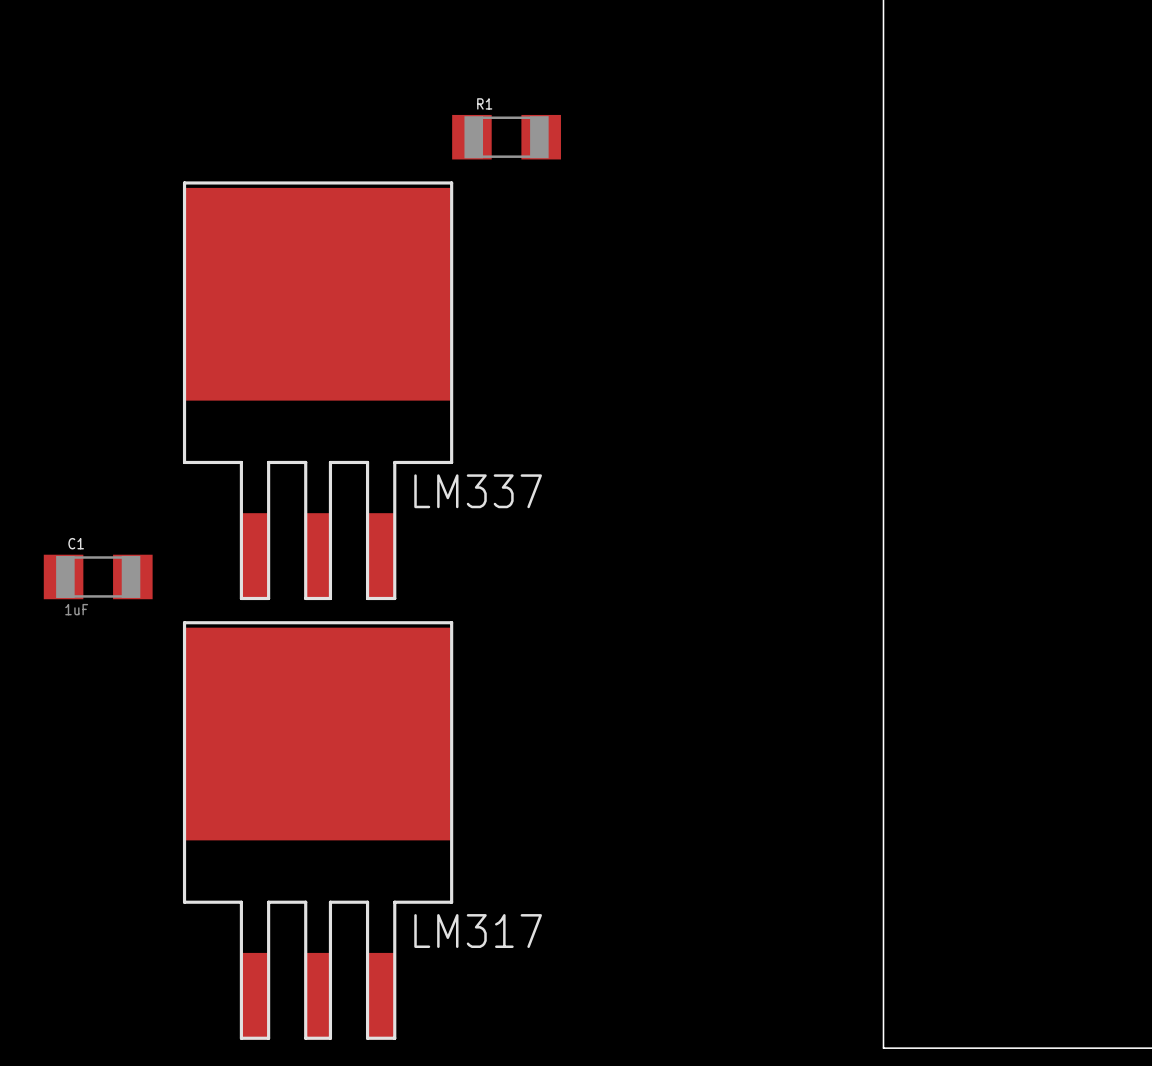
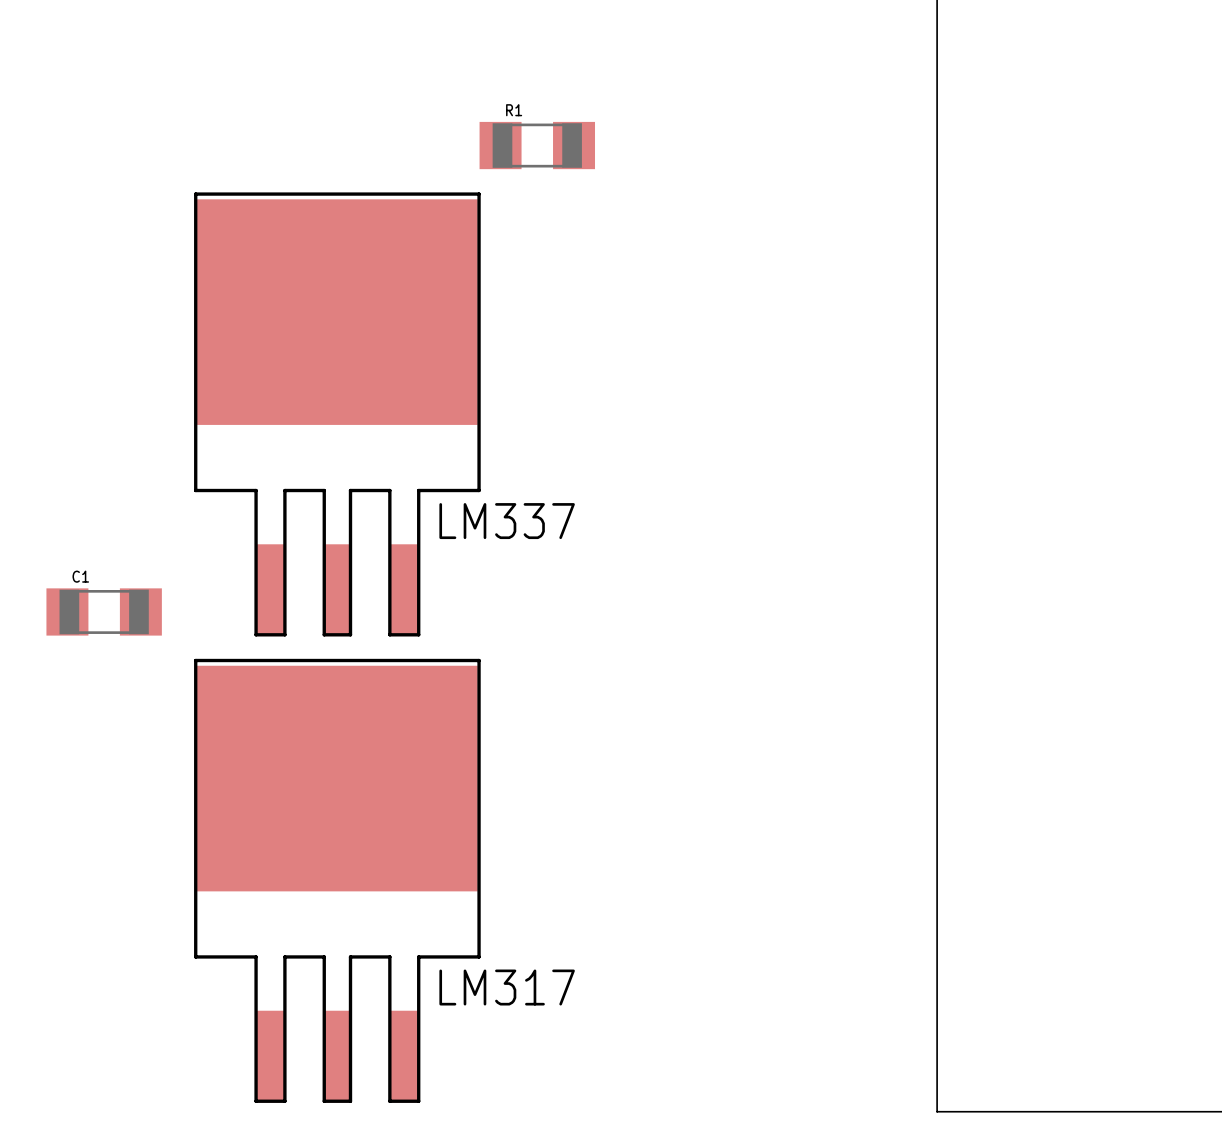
C1 value: 1uF (76, 609) -> none

